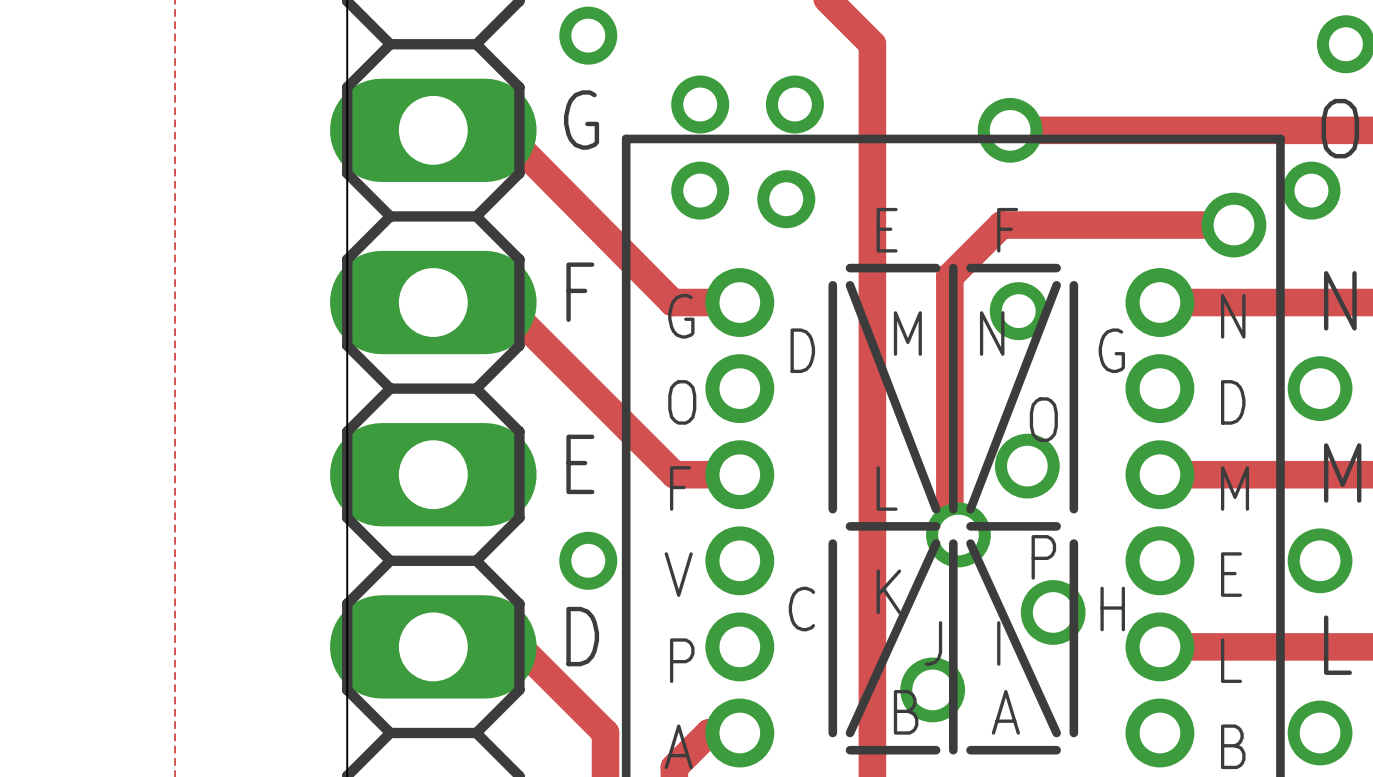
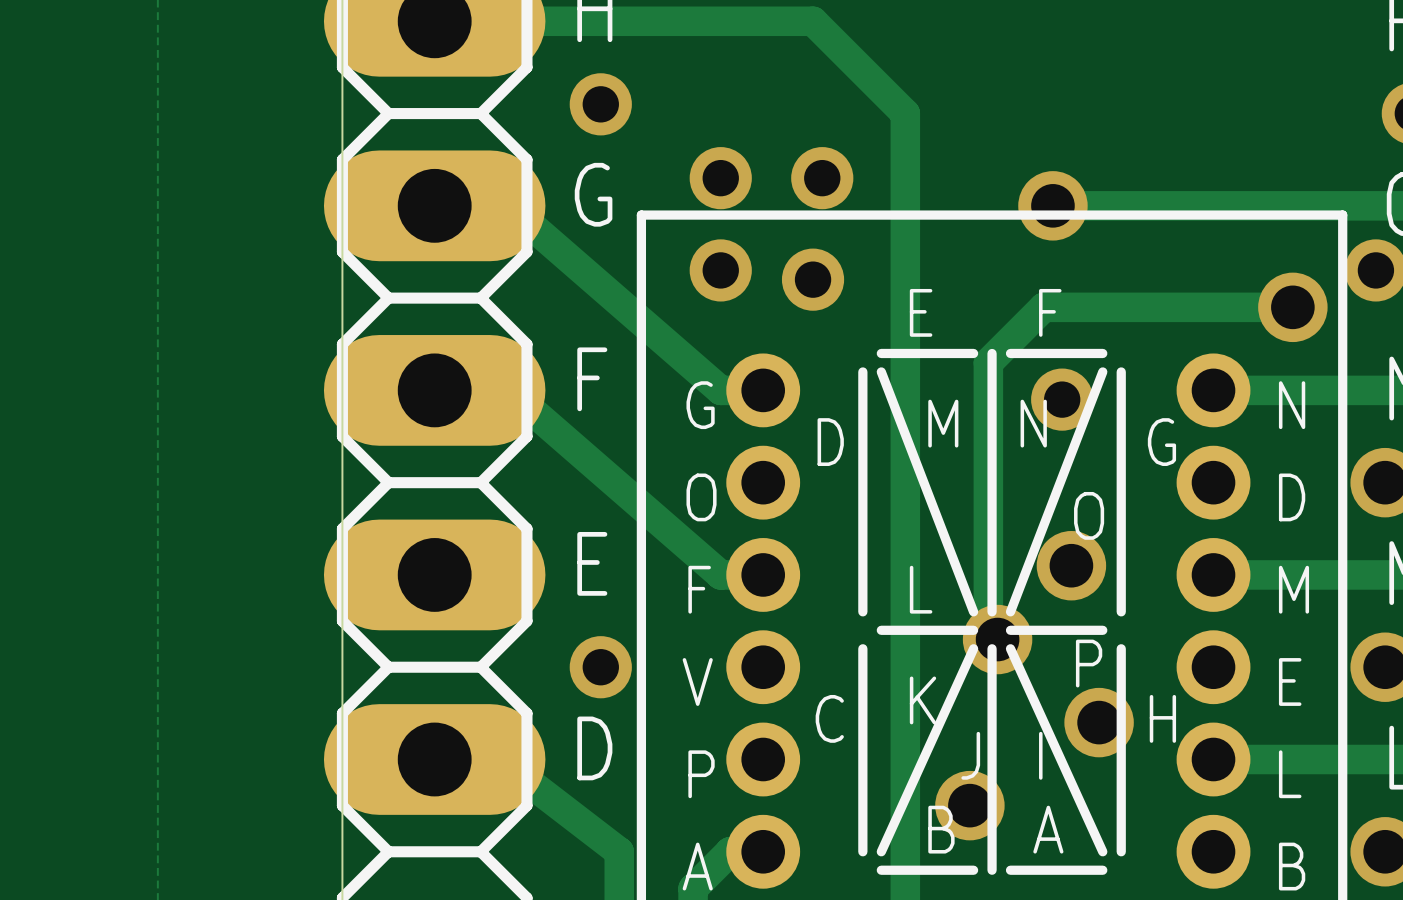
track: (502, 130) (672, 302) (700, 302) -> (508, 205) (720, 390)
track: (502, 302) (674, 474) (700, 474) -> (508, 390) (720, 574)
track: (493, 646) (519, 646) (605, 732) -> (499, 759) (619, 851)

